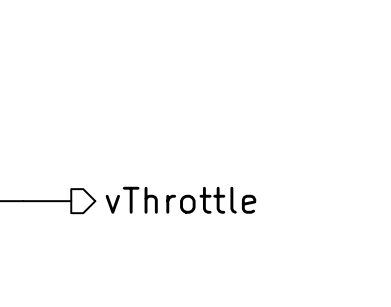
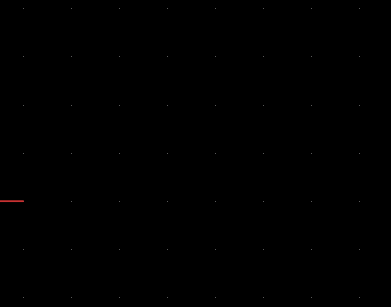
hierarchical label: vThrottle (180, 200) -> none
wire: (23, 201) (71, 201) -> none

